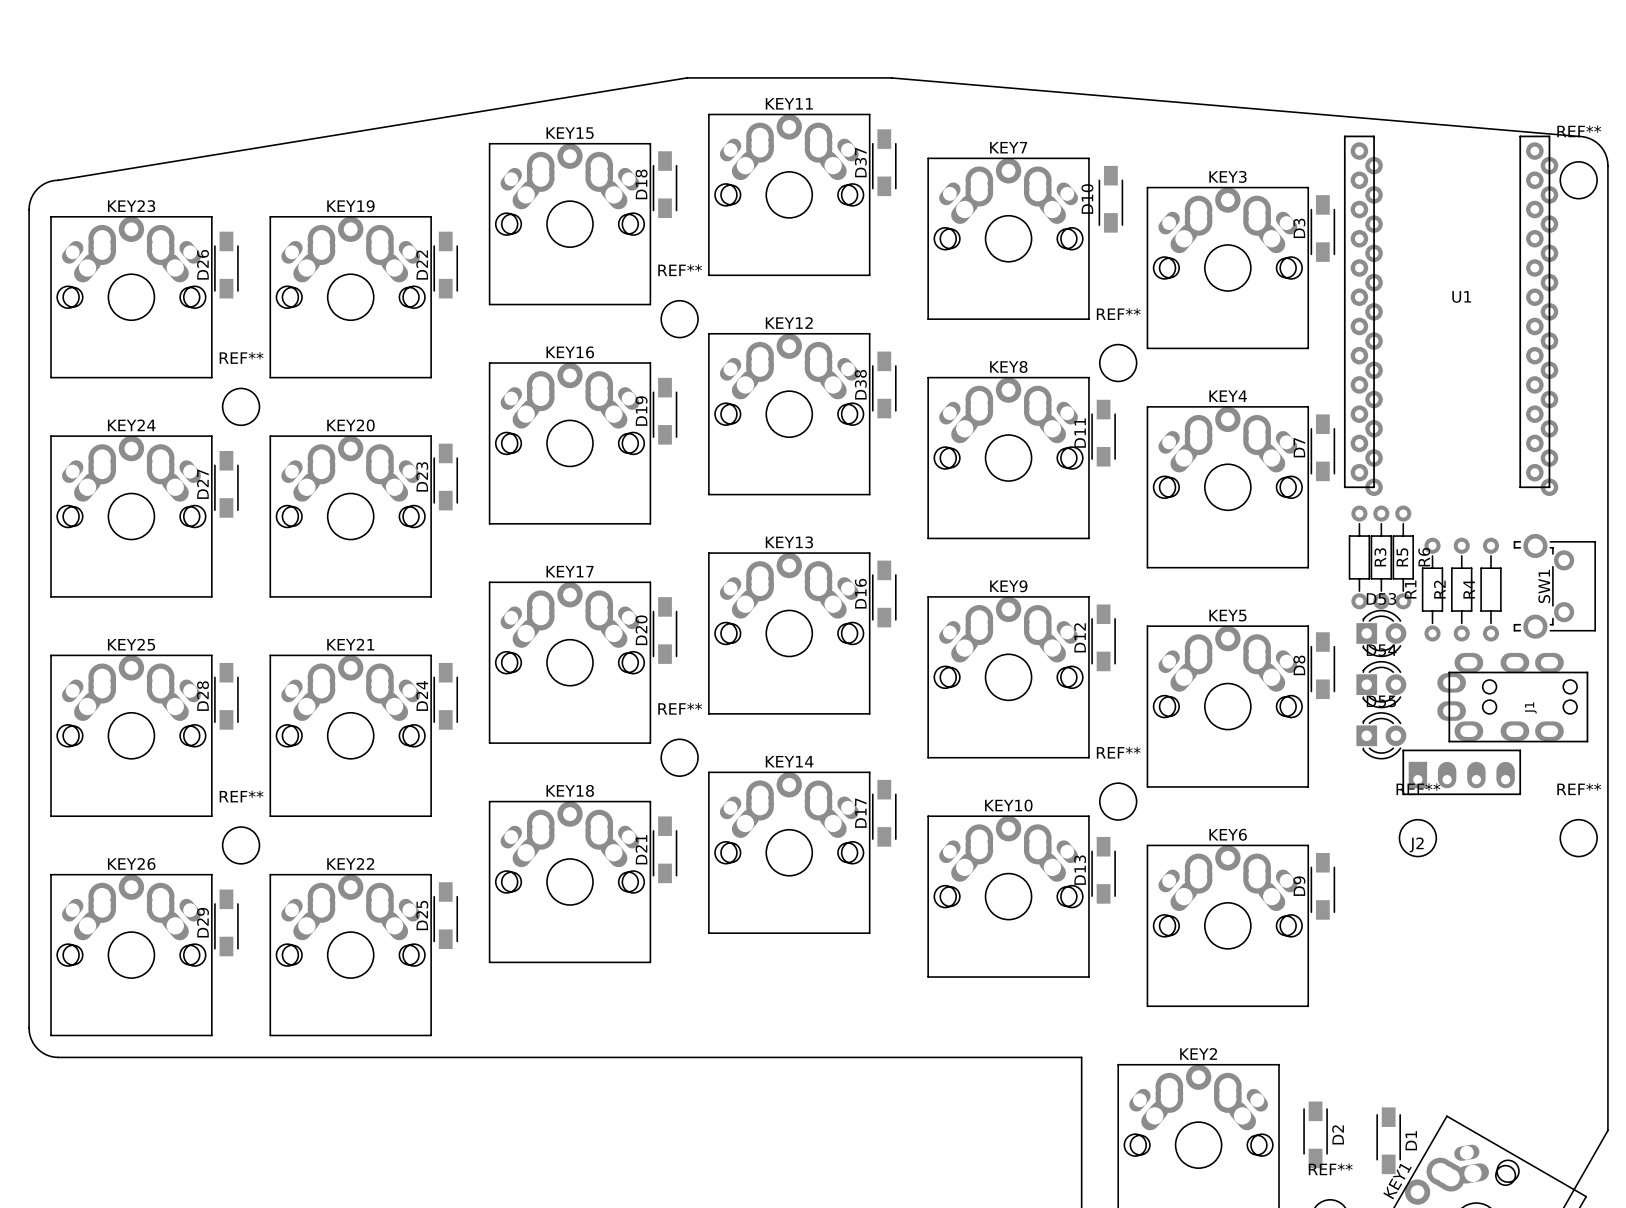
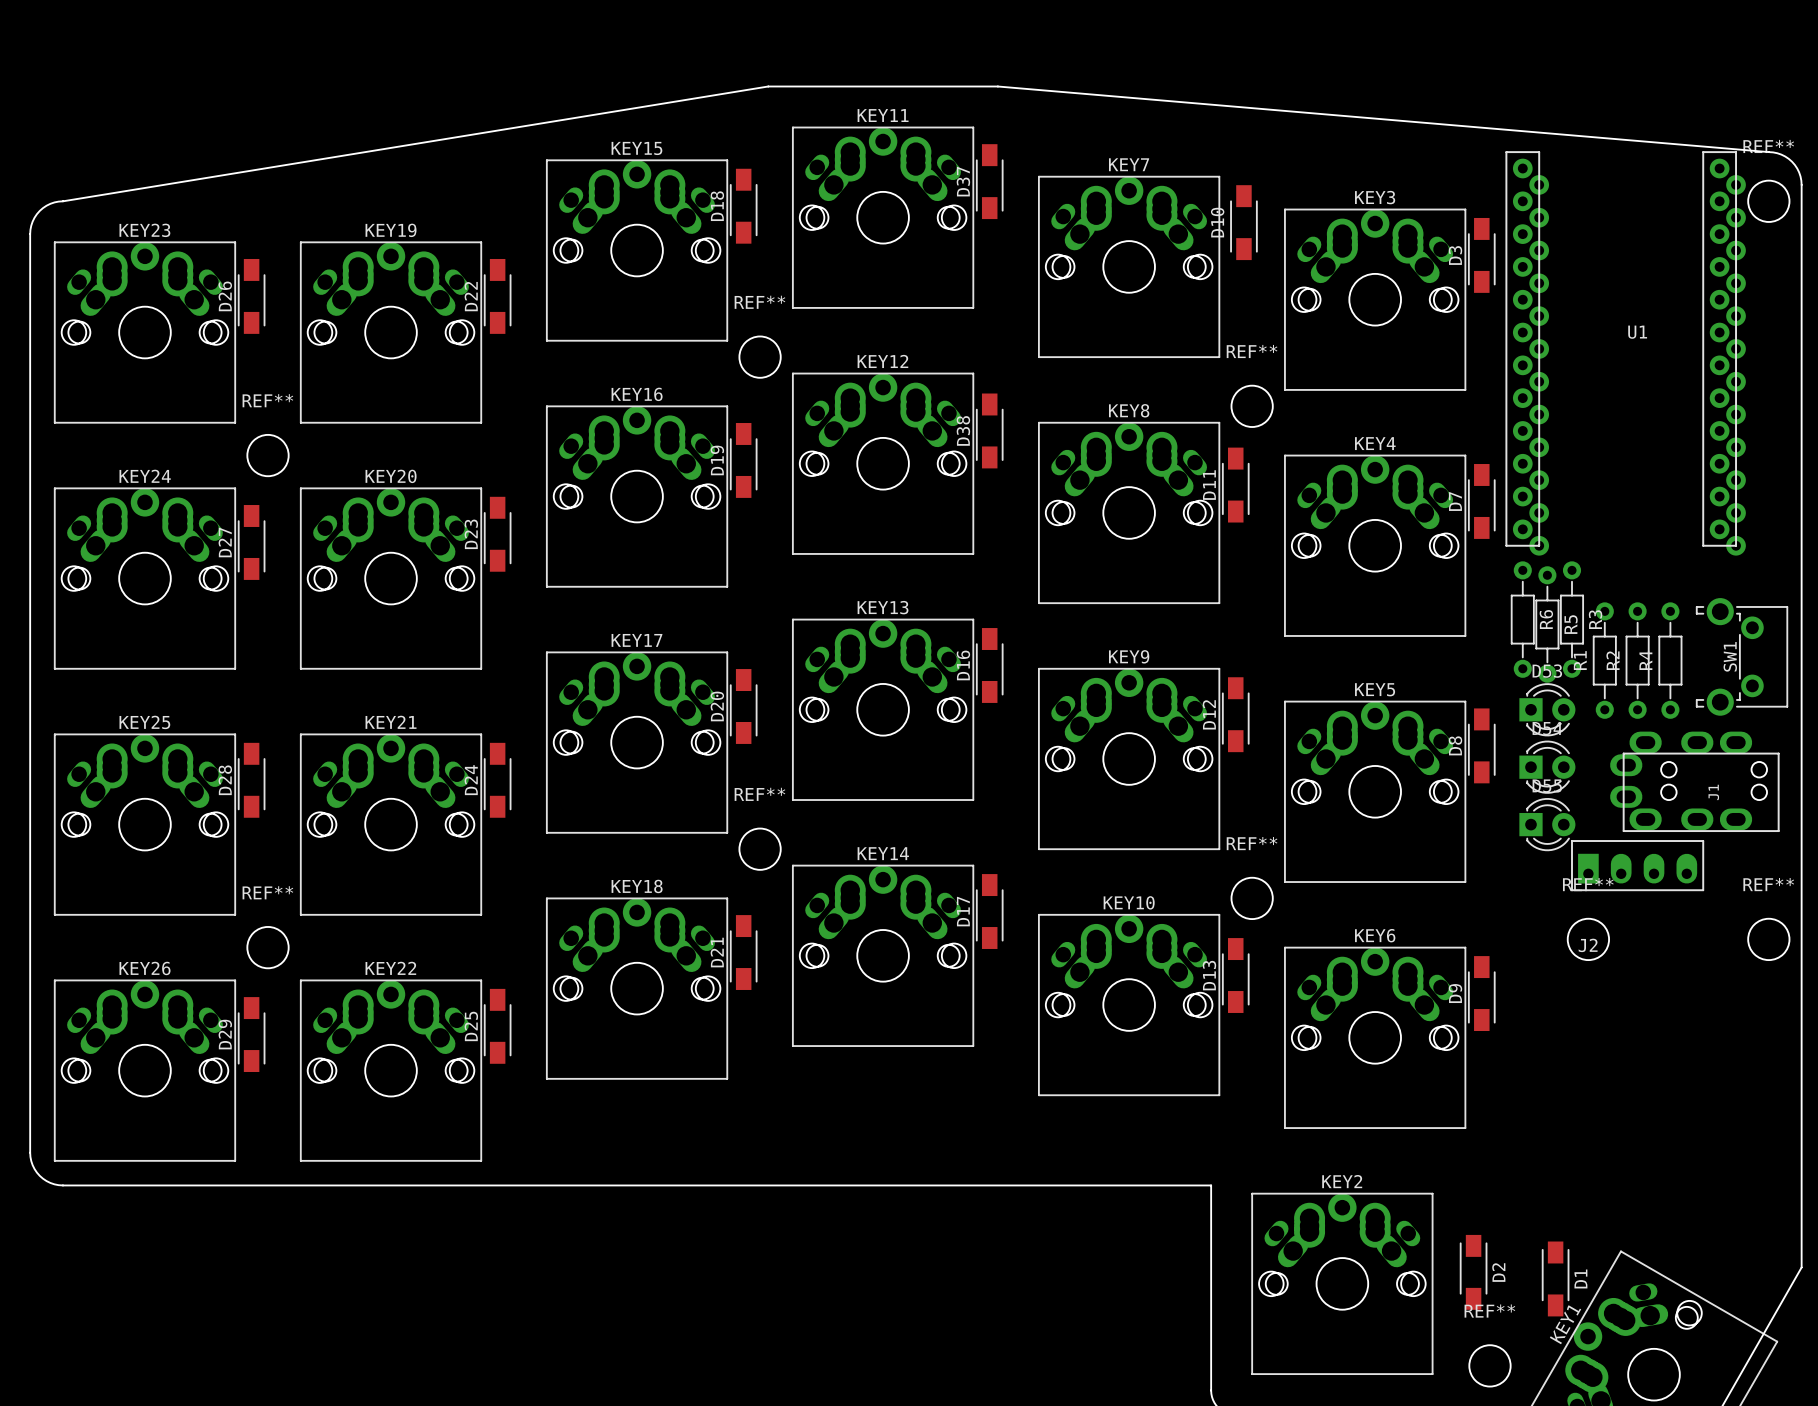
R3 position: (1359, 557) -> (1572, 619)
R6 position: (1403, 557) -> (1522, 619)

